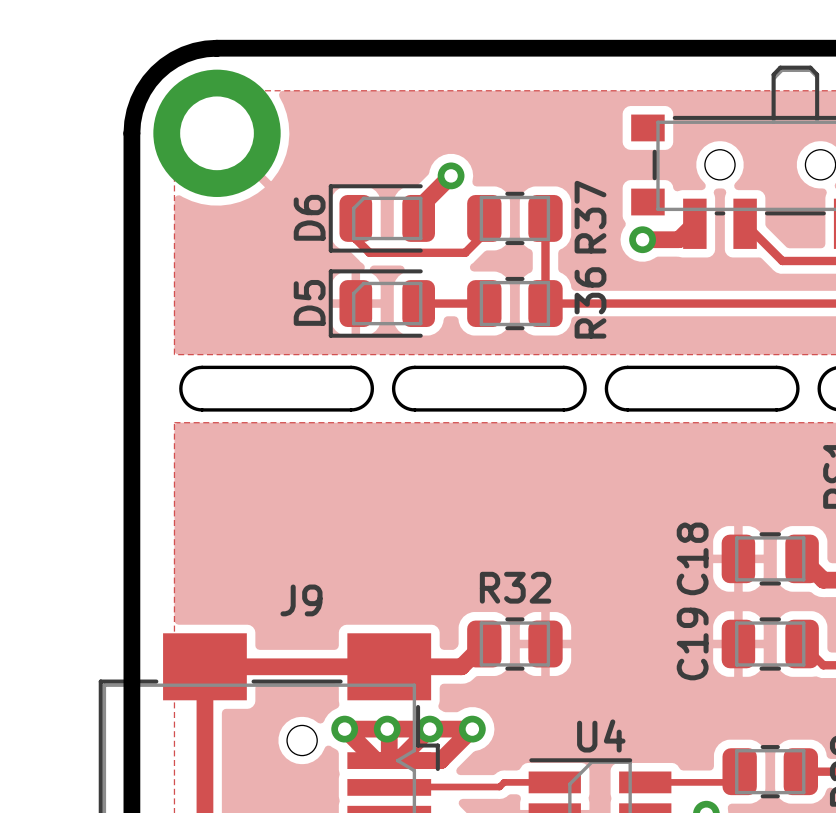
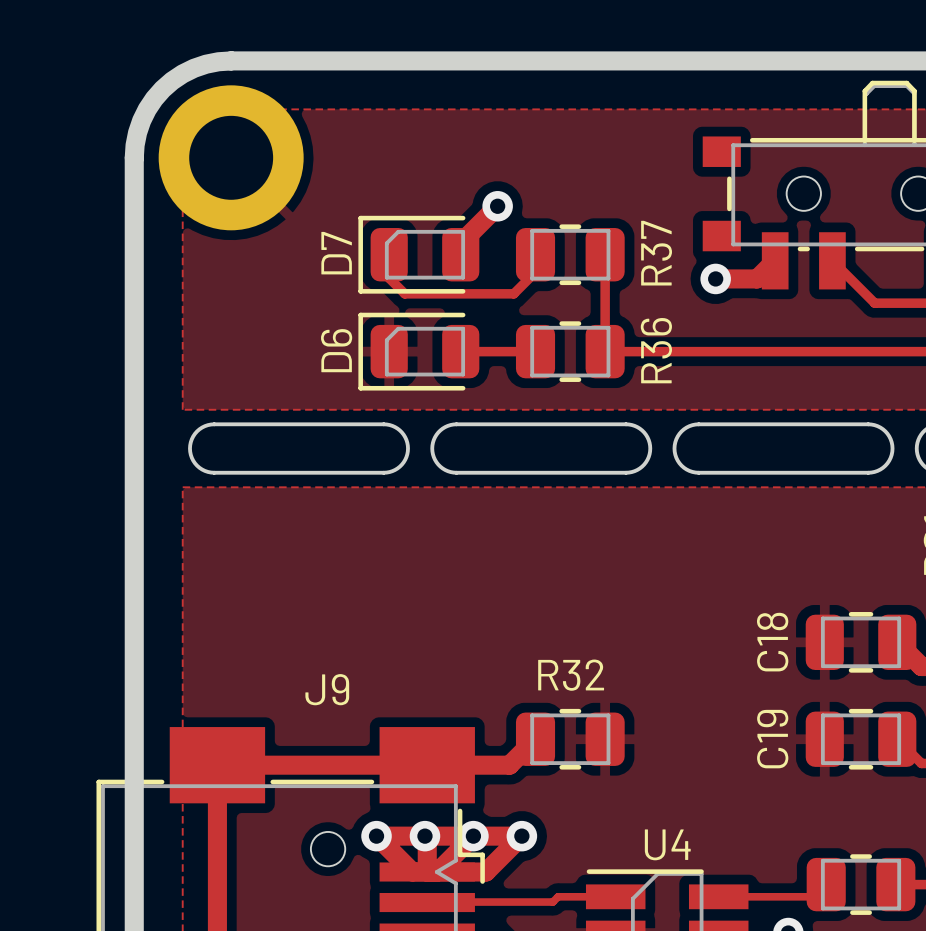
D6 name: D6 (309, 217) -> D7 (336, 253)
D5 name: D5 (309, 302) -> D6 (336, 350)

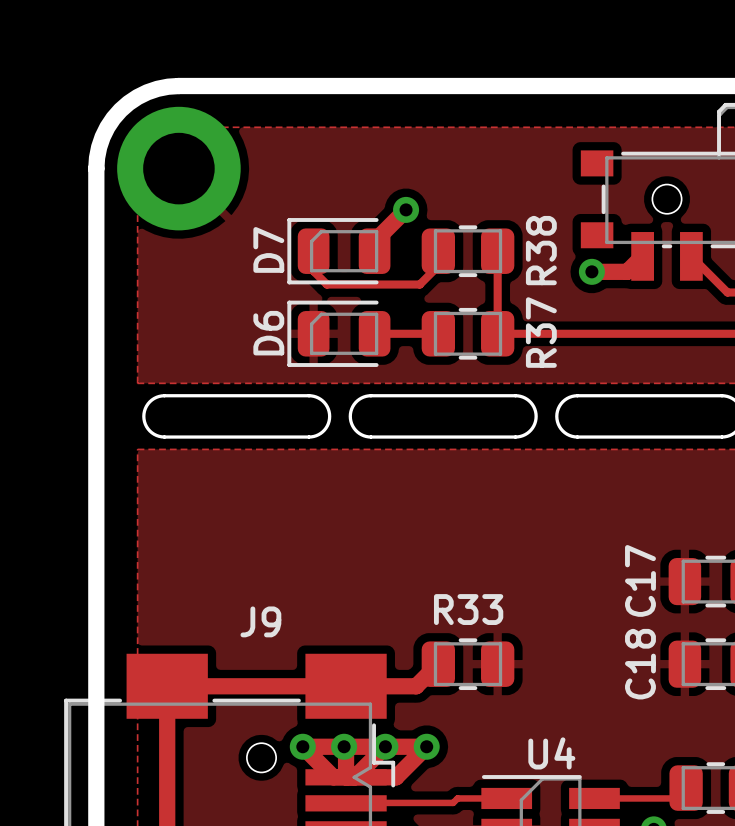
R37 name: R37 (656, 253) -> R38 (541, 250)
R36 name: R36 (656, 350) -> R37 (541, 332)
C18 name: C18 (772, 642) -> C17 (640, 580)
R32 name: R32 (571, 675) -> R33 (468, 609)
C19 name: C19 (772, 739) -> C18 (640, 664)

